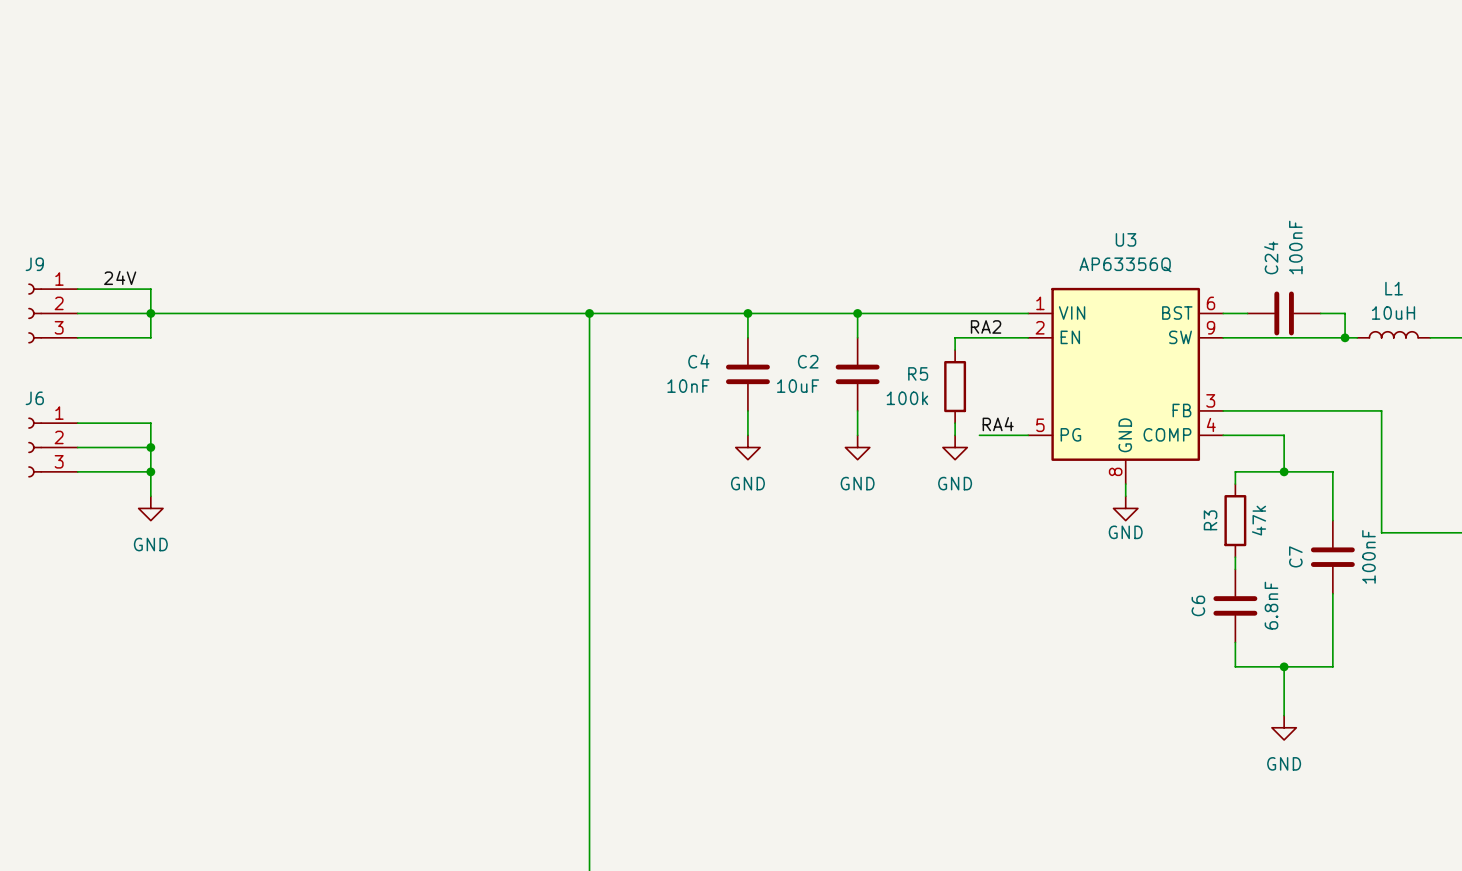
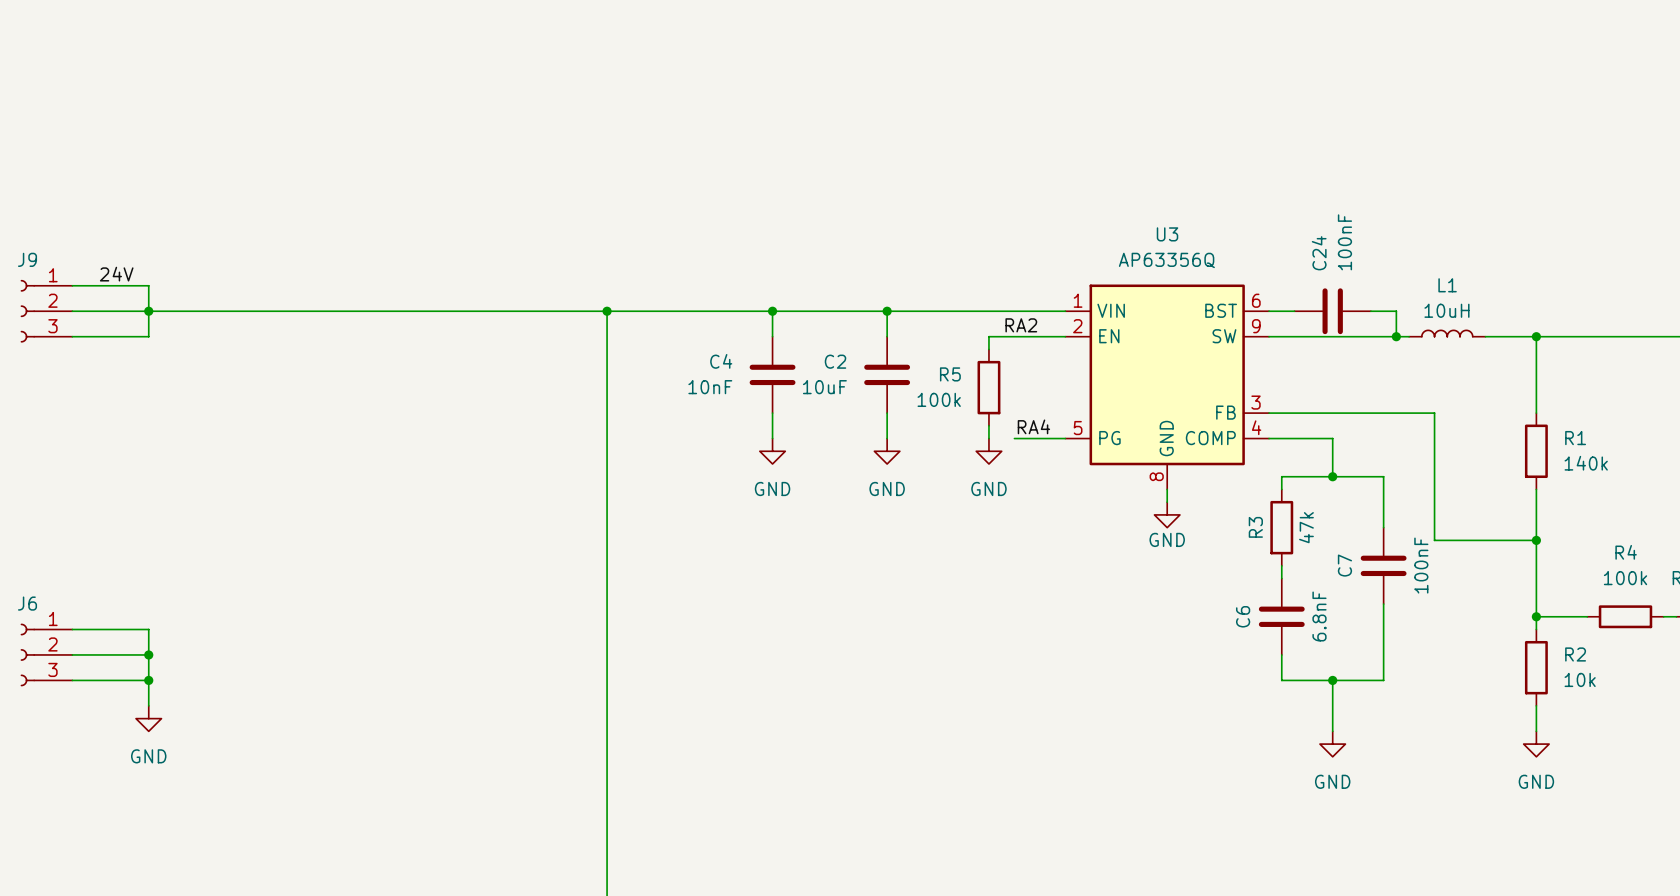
wire: (77, 423) (150, 423) (150, 496) -> (72, 629) (148, 629) (148, 705)
J6 position: (52, 447) -> (46, 654)
wire: (77, 447) (150, 447) -> (72, 680) (148, 680)
junction: (150, 447) -> none
wire: (77, 471) (150, 471) -> (72, 654) (148, 654)
junction: (150, 471) -> none
power symbol position: GND (150, 508) -> GND (148, 718)
junction: none -> (148, 654)
junction: none -> (148, 680)

